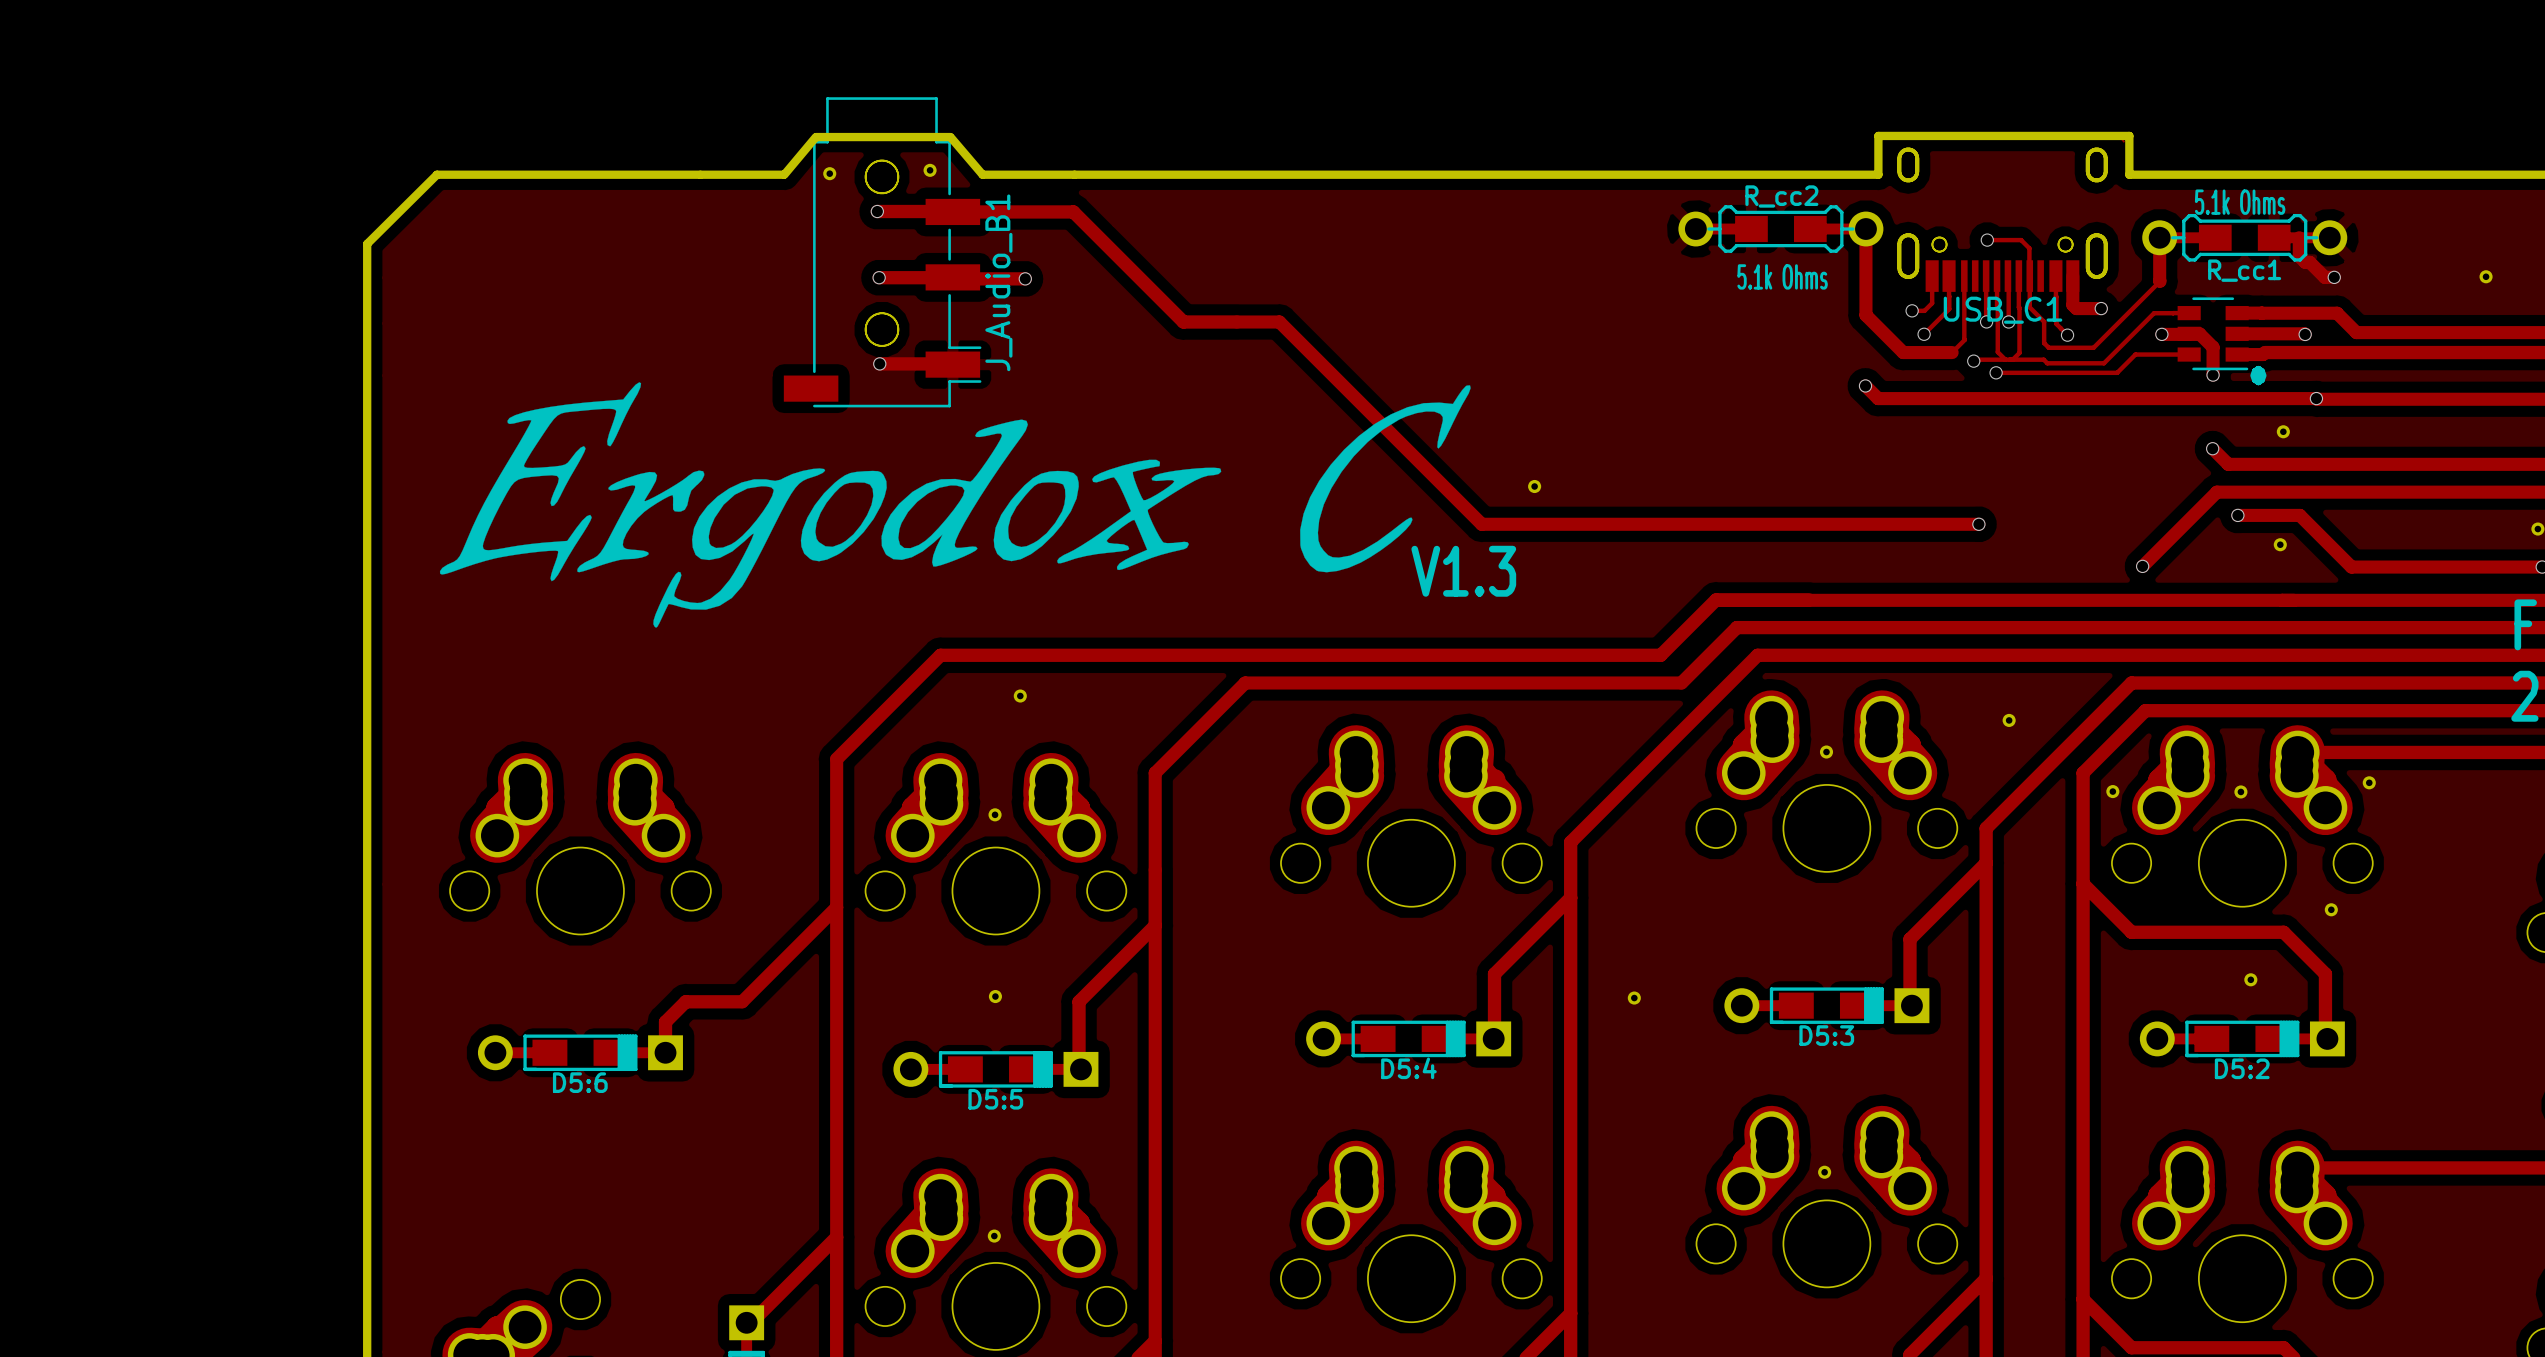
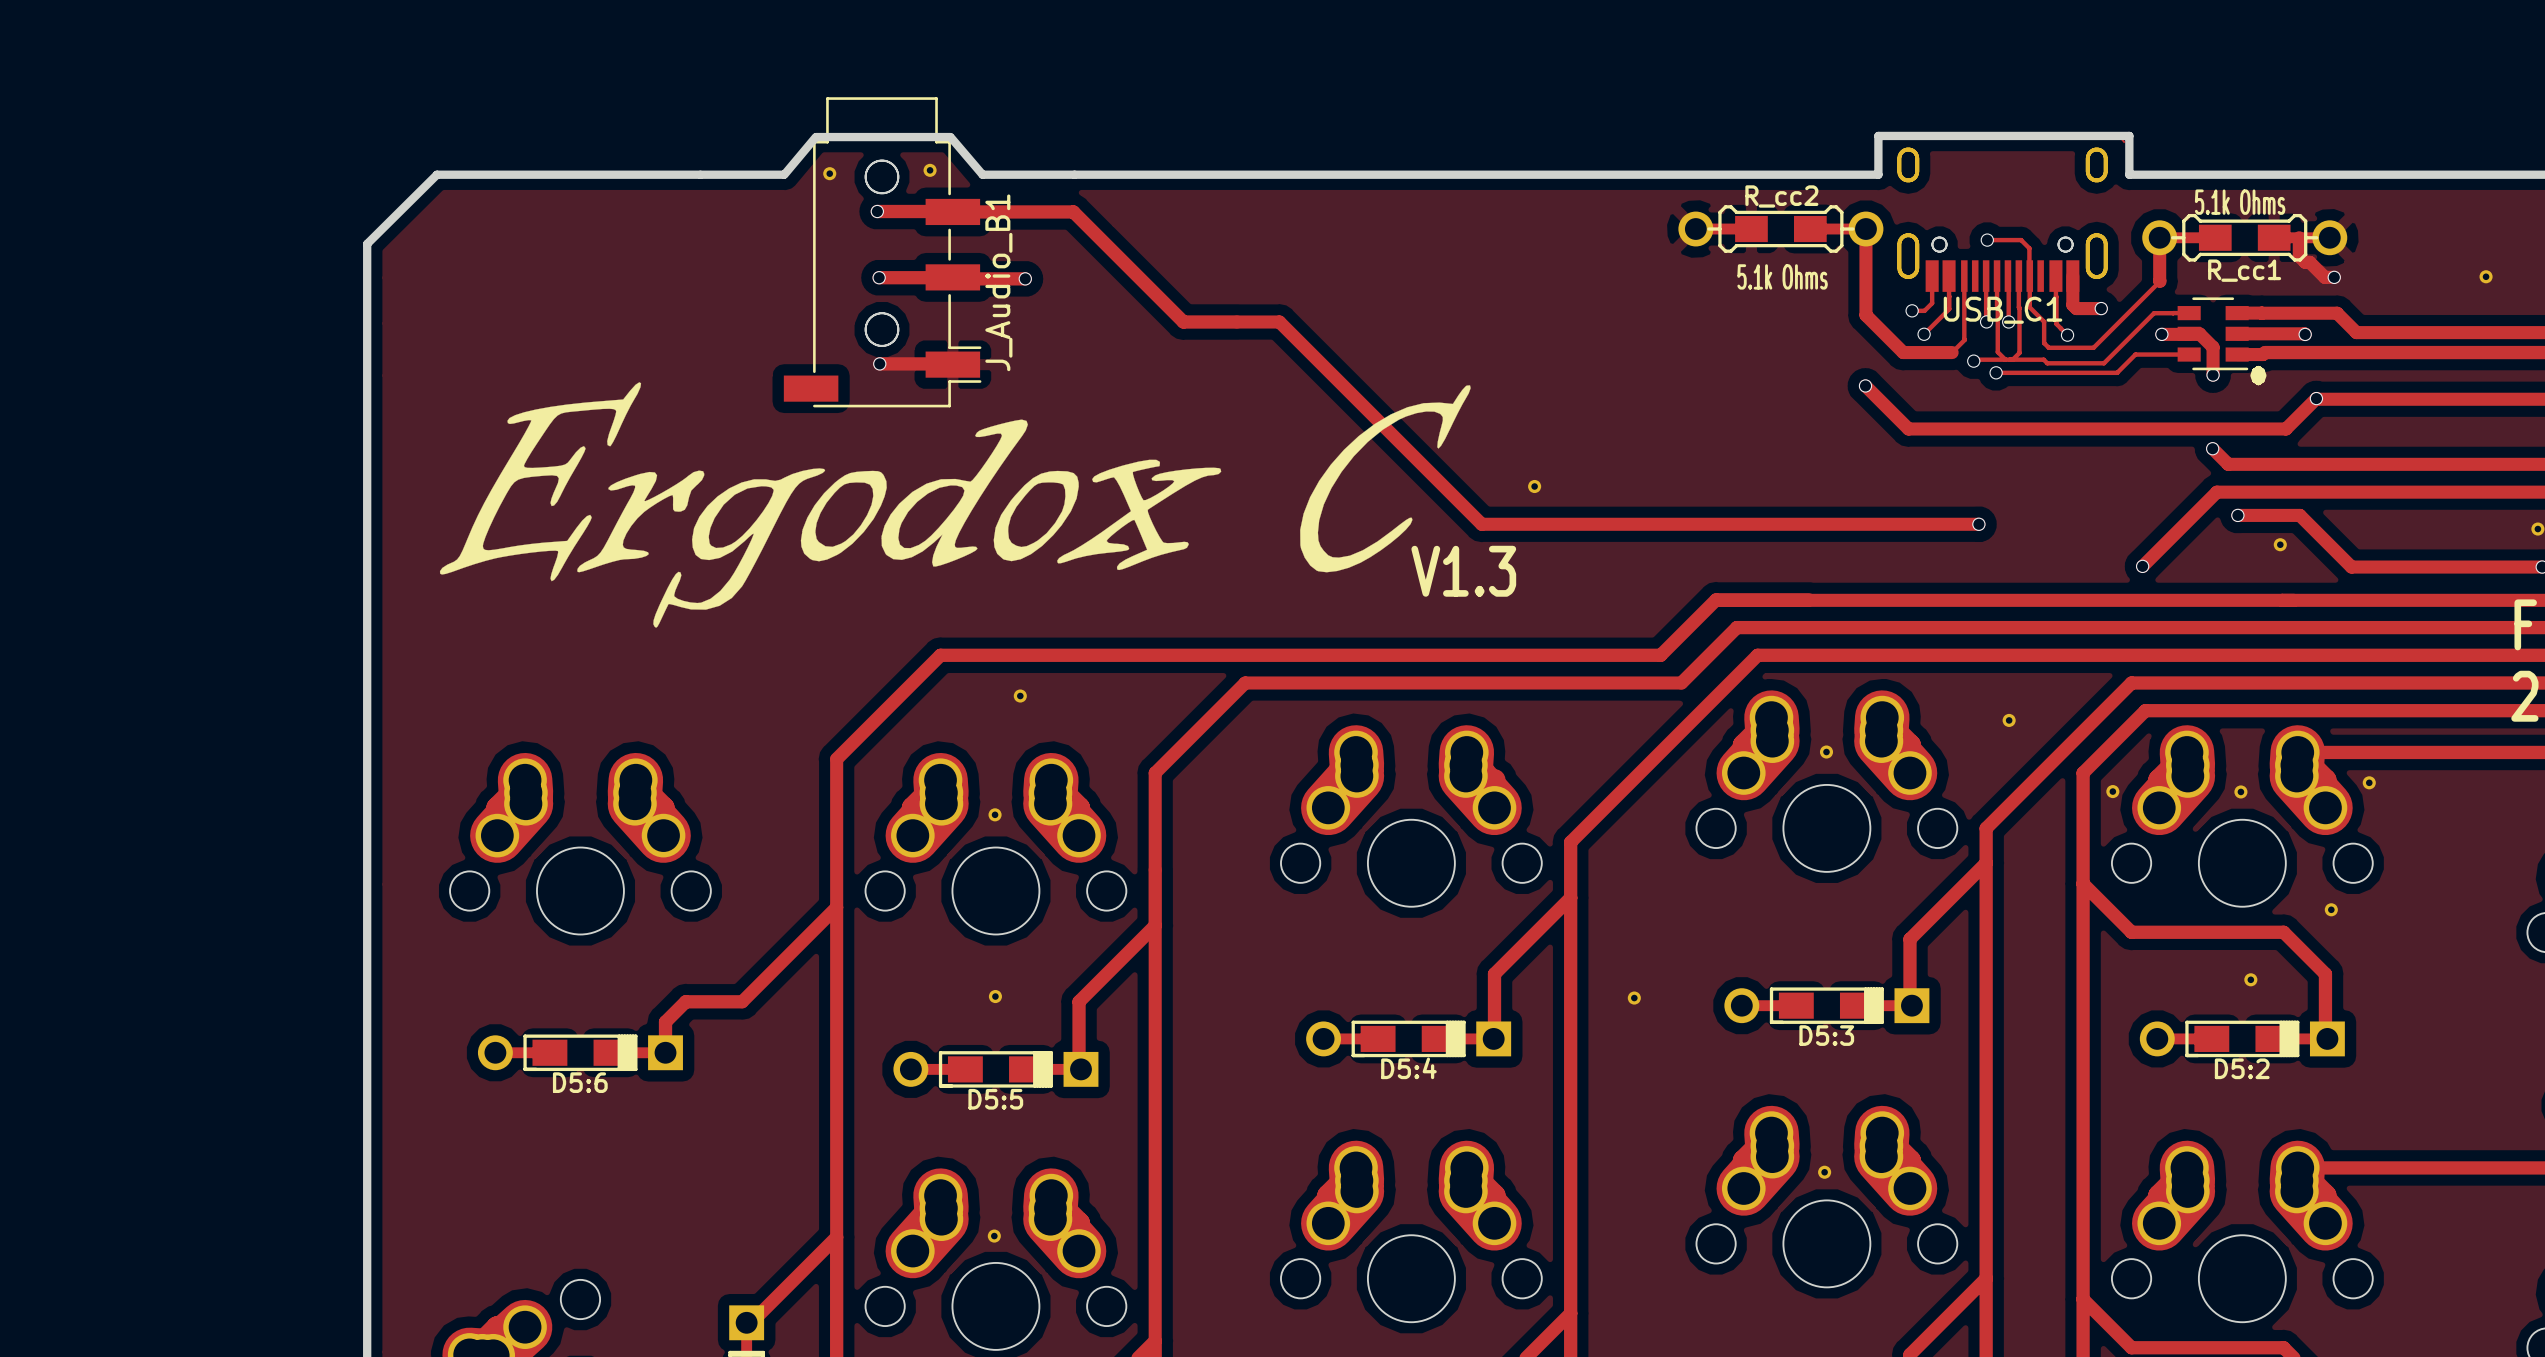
track: (1878, 398) (2316, 398) -> (1878, 398) (1908, 429) (2286, 429) (2316, 398)
part: (2283, 431) -> none

